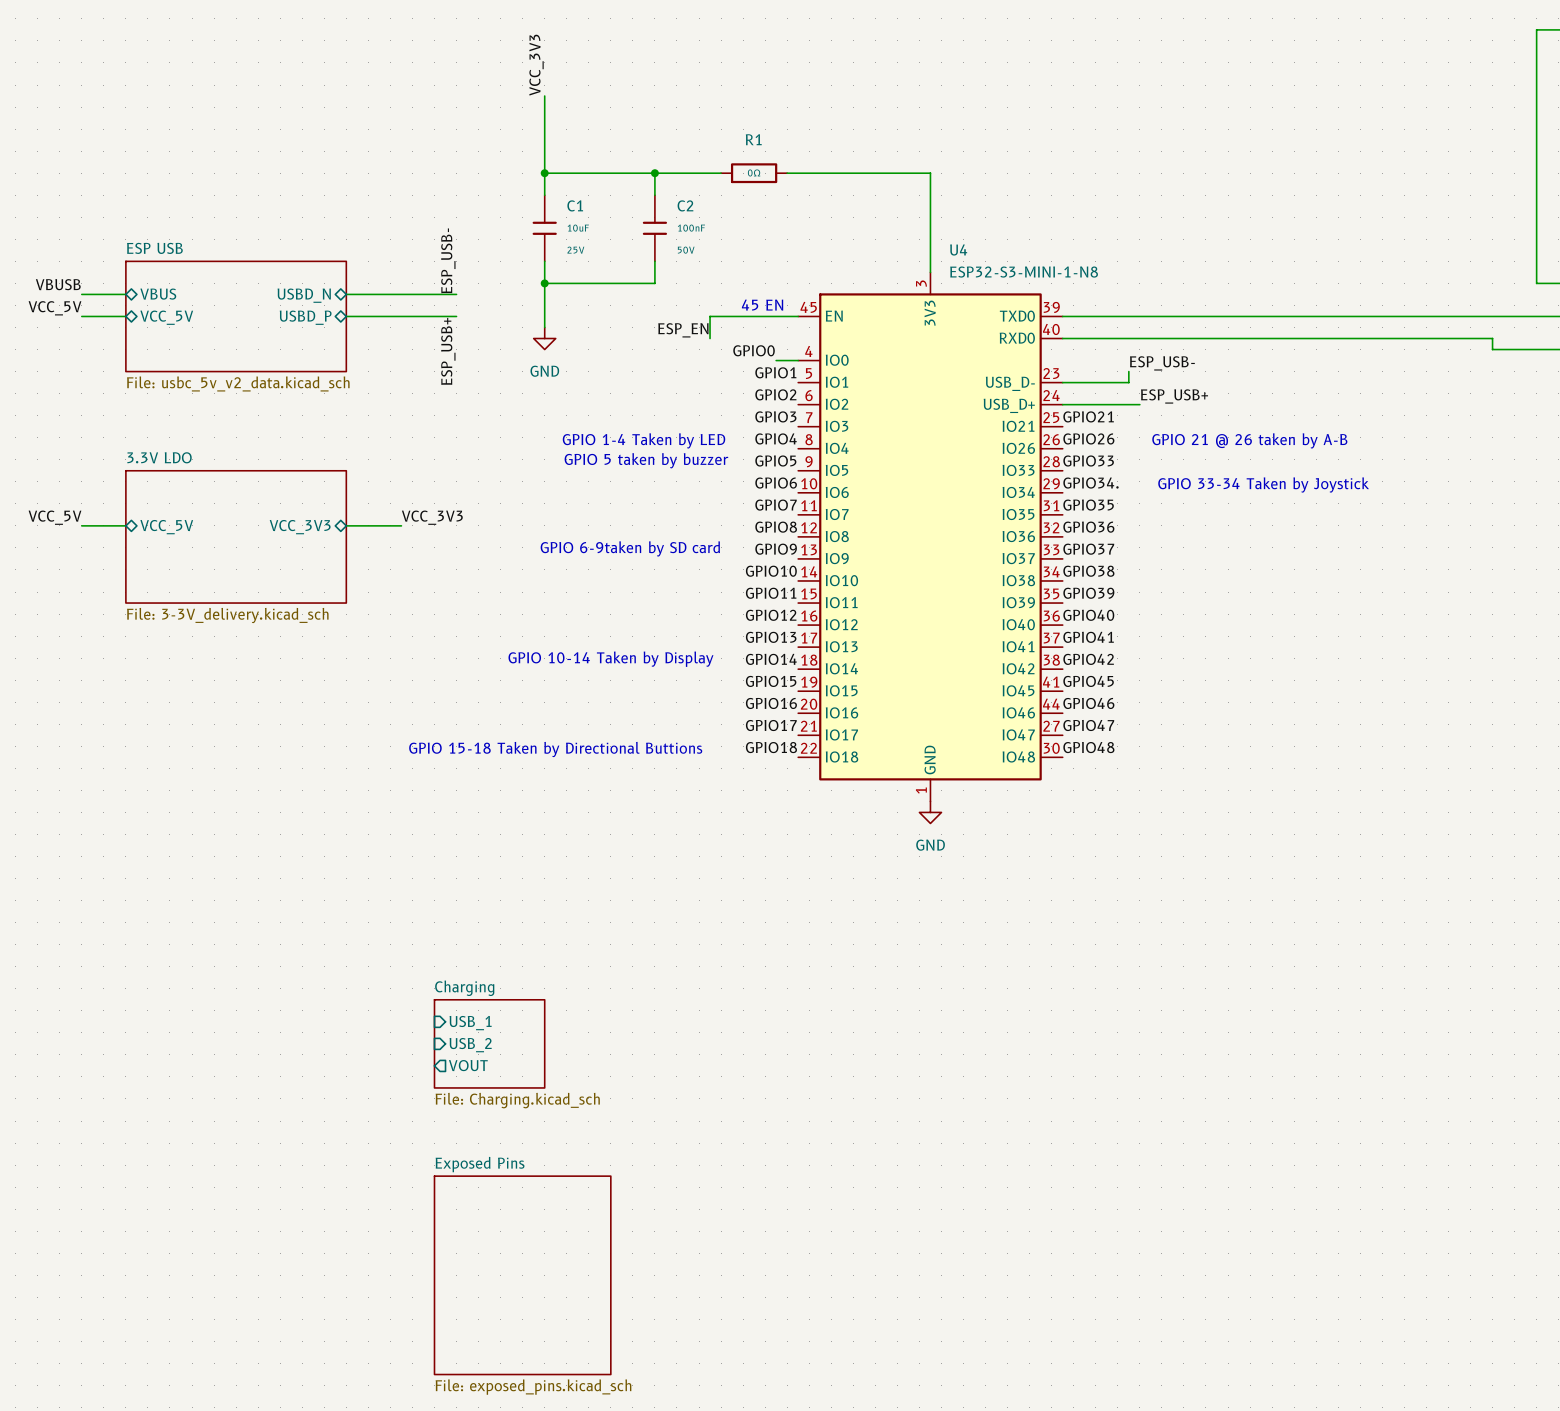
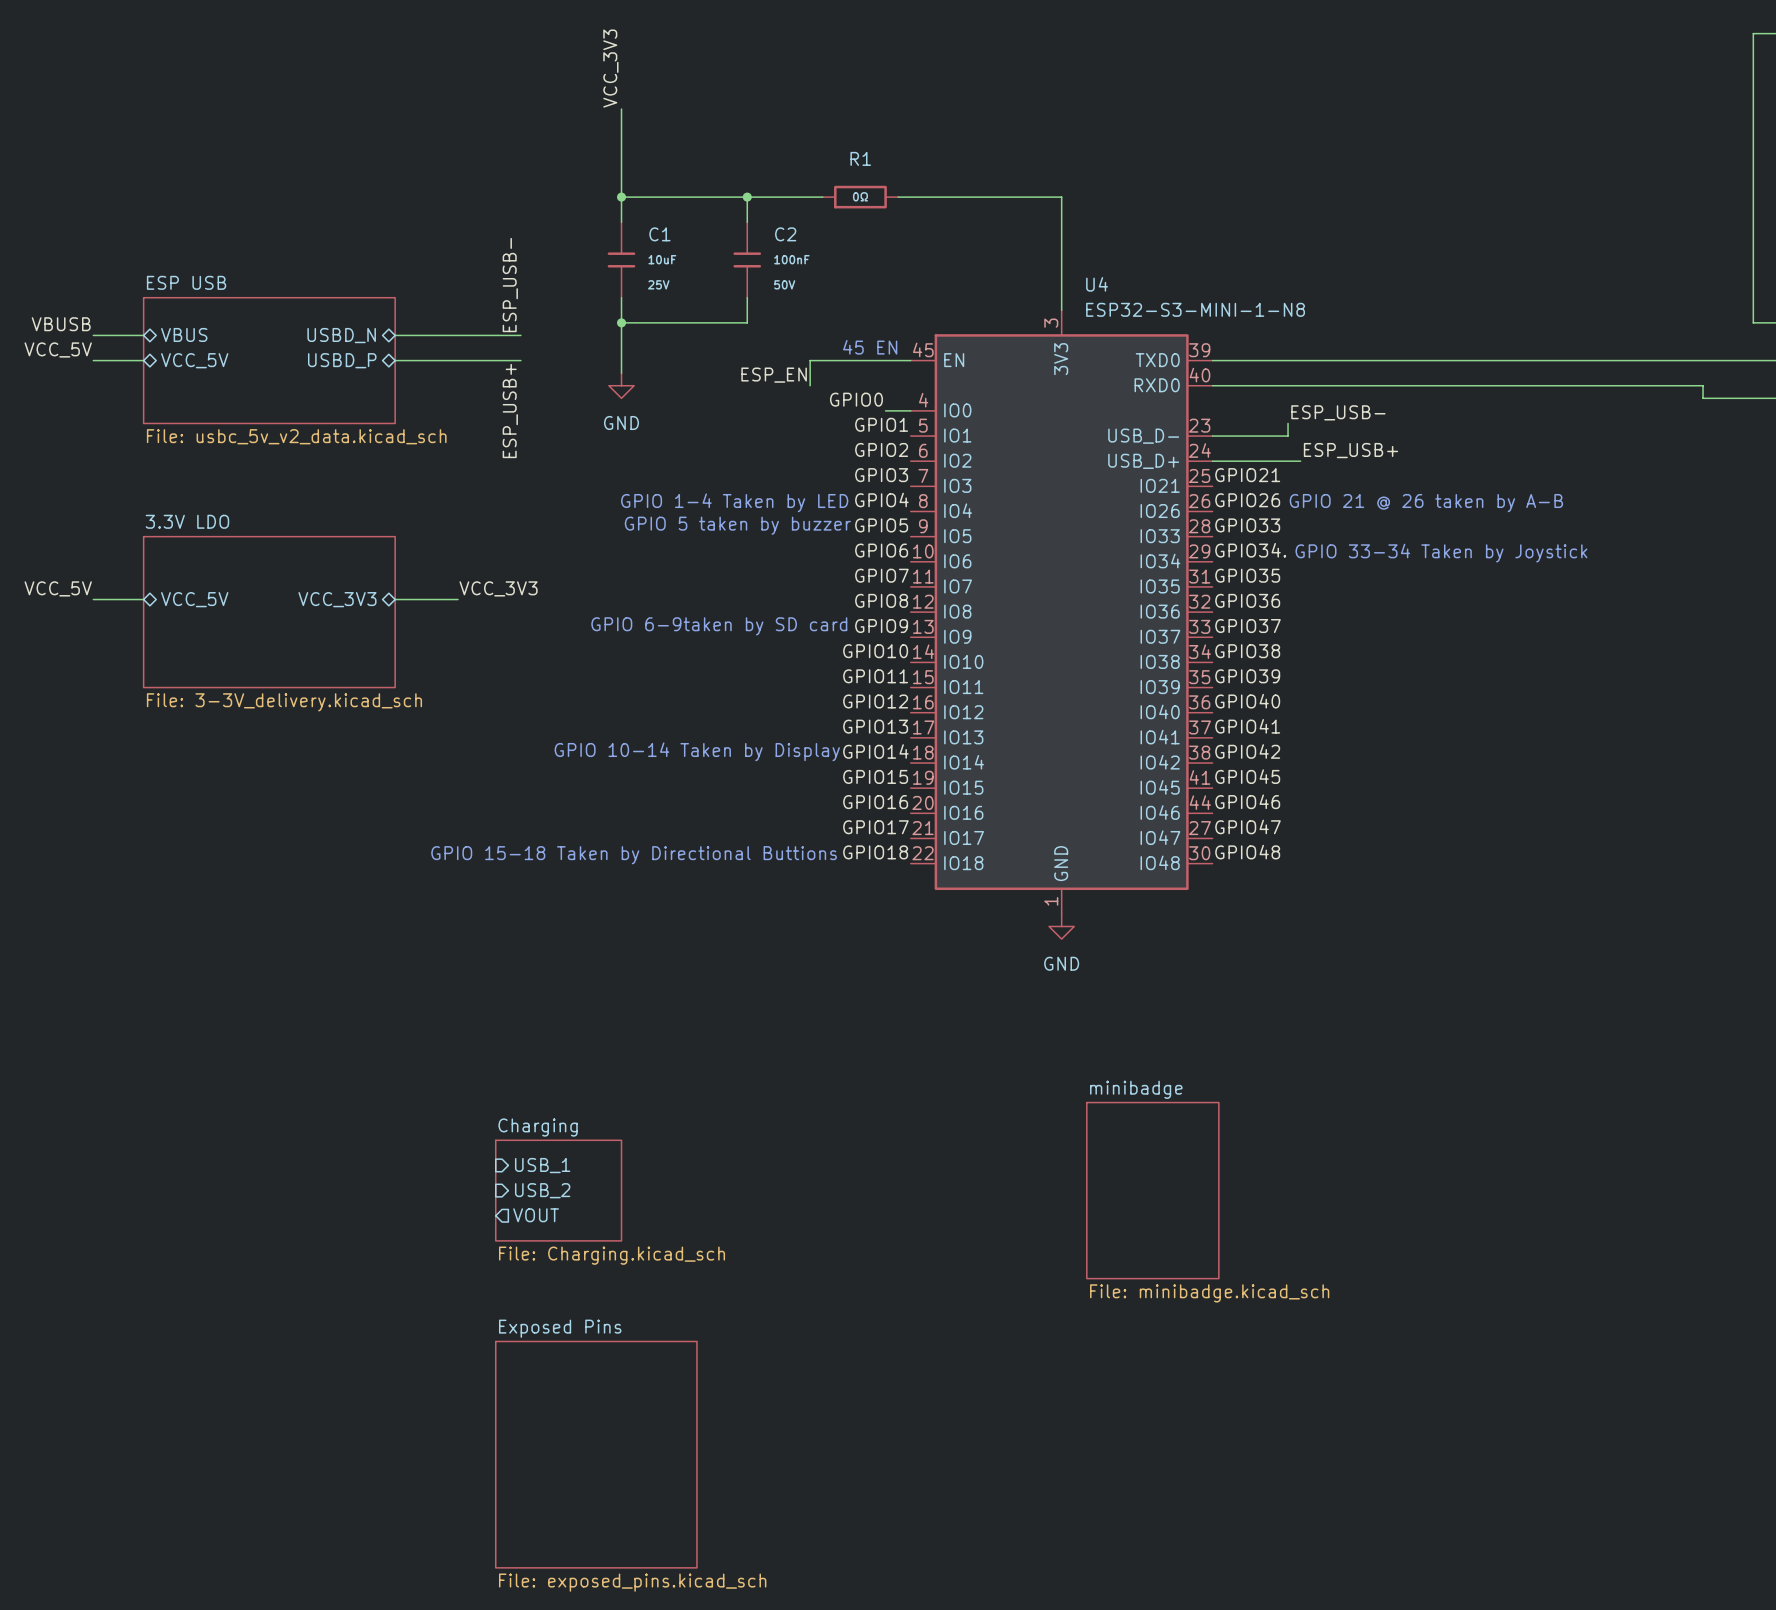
sheet minibadge: none -> File: minibadge.kicad_sch (1152, 1190)

